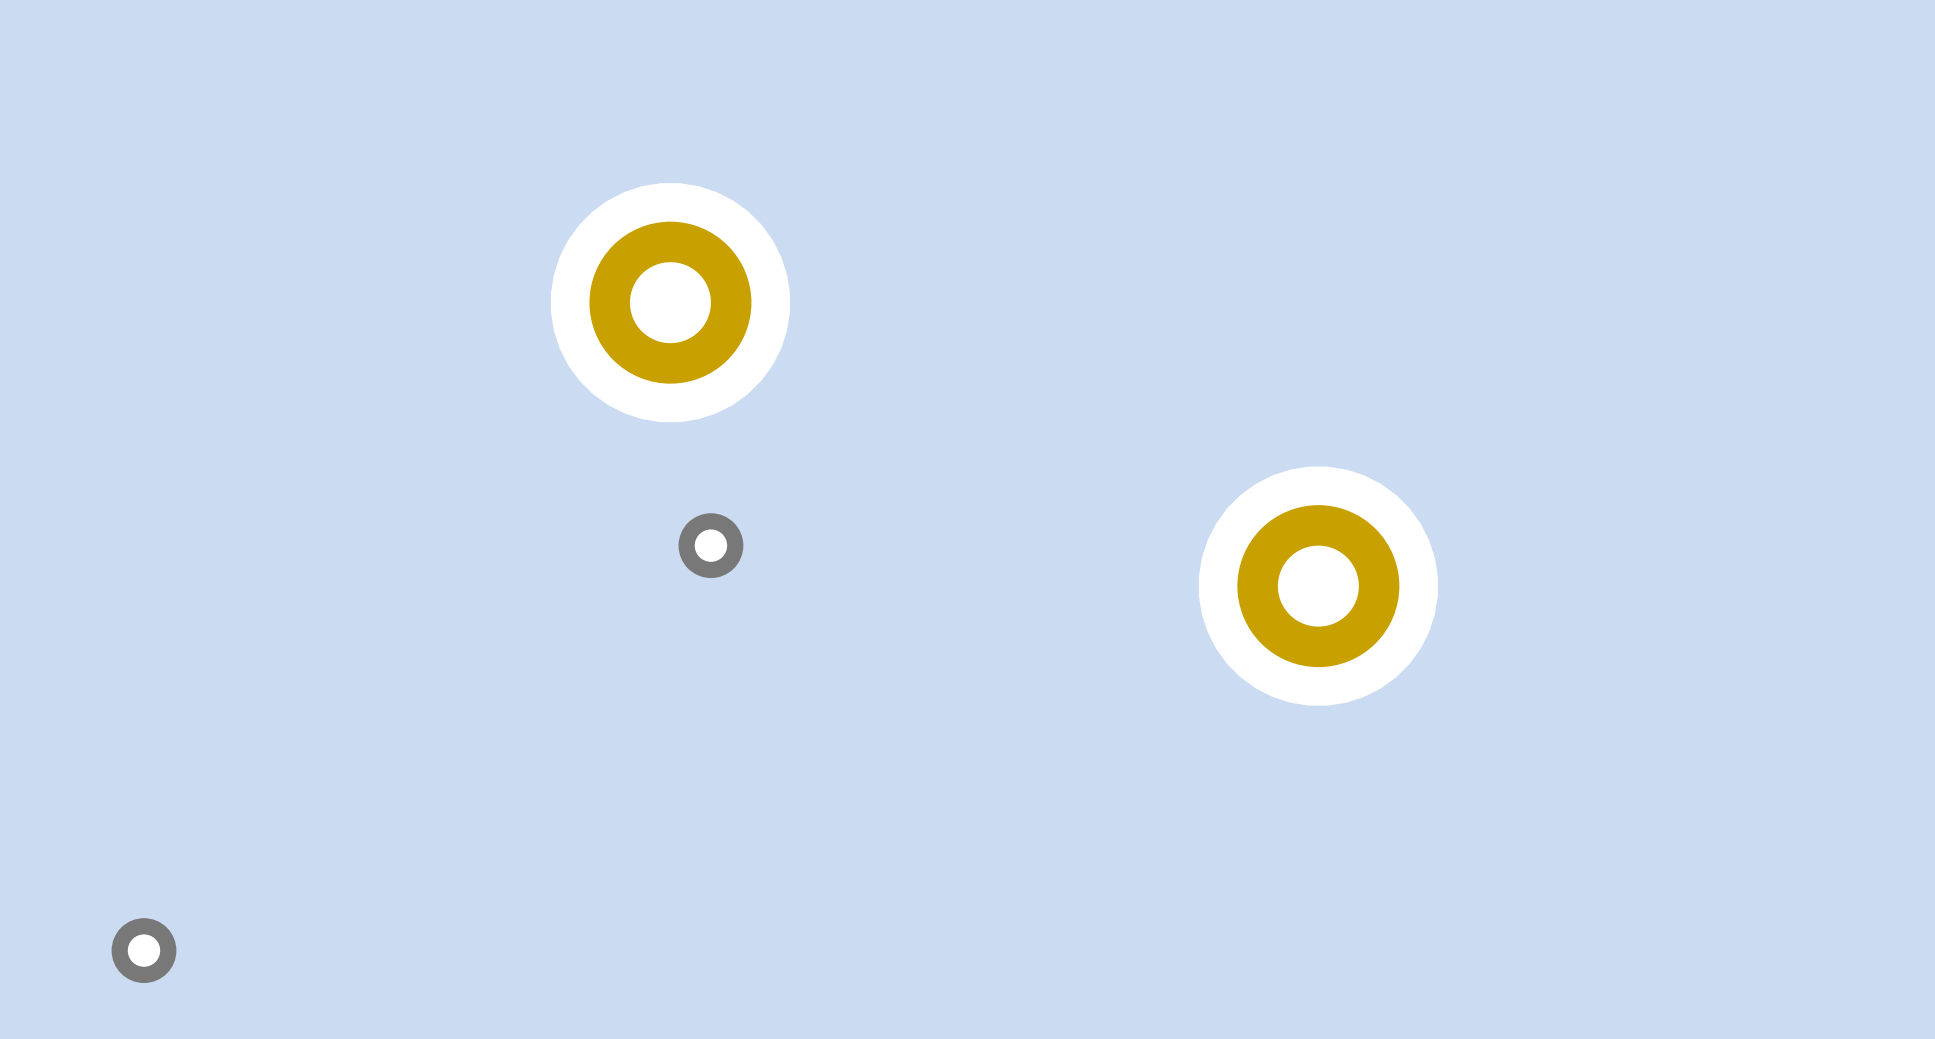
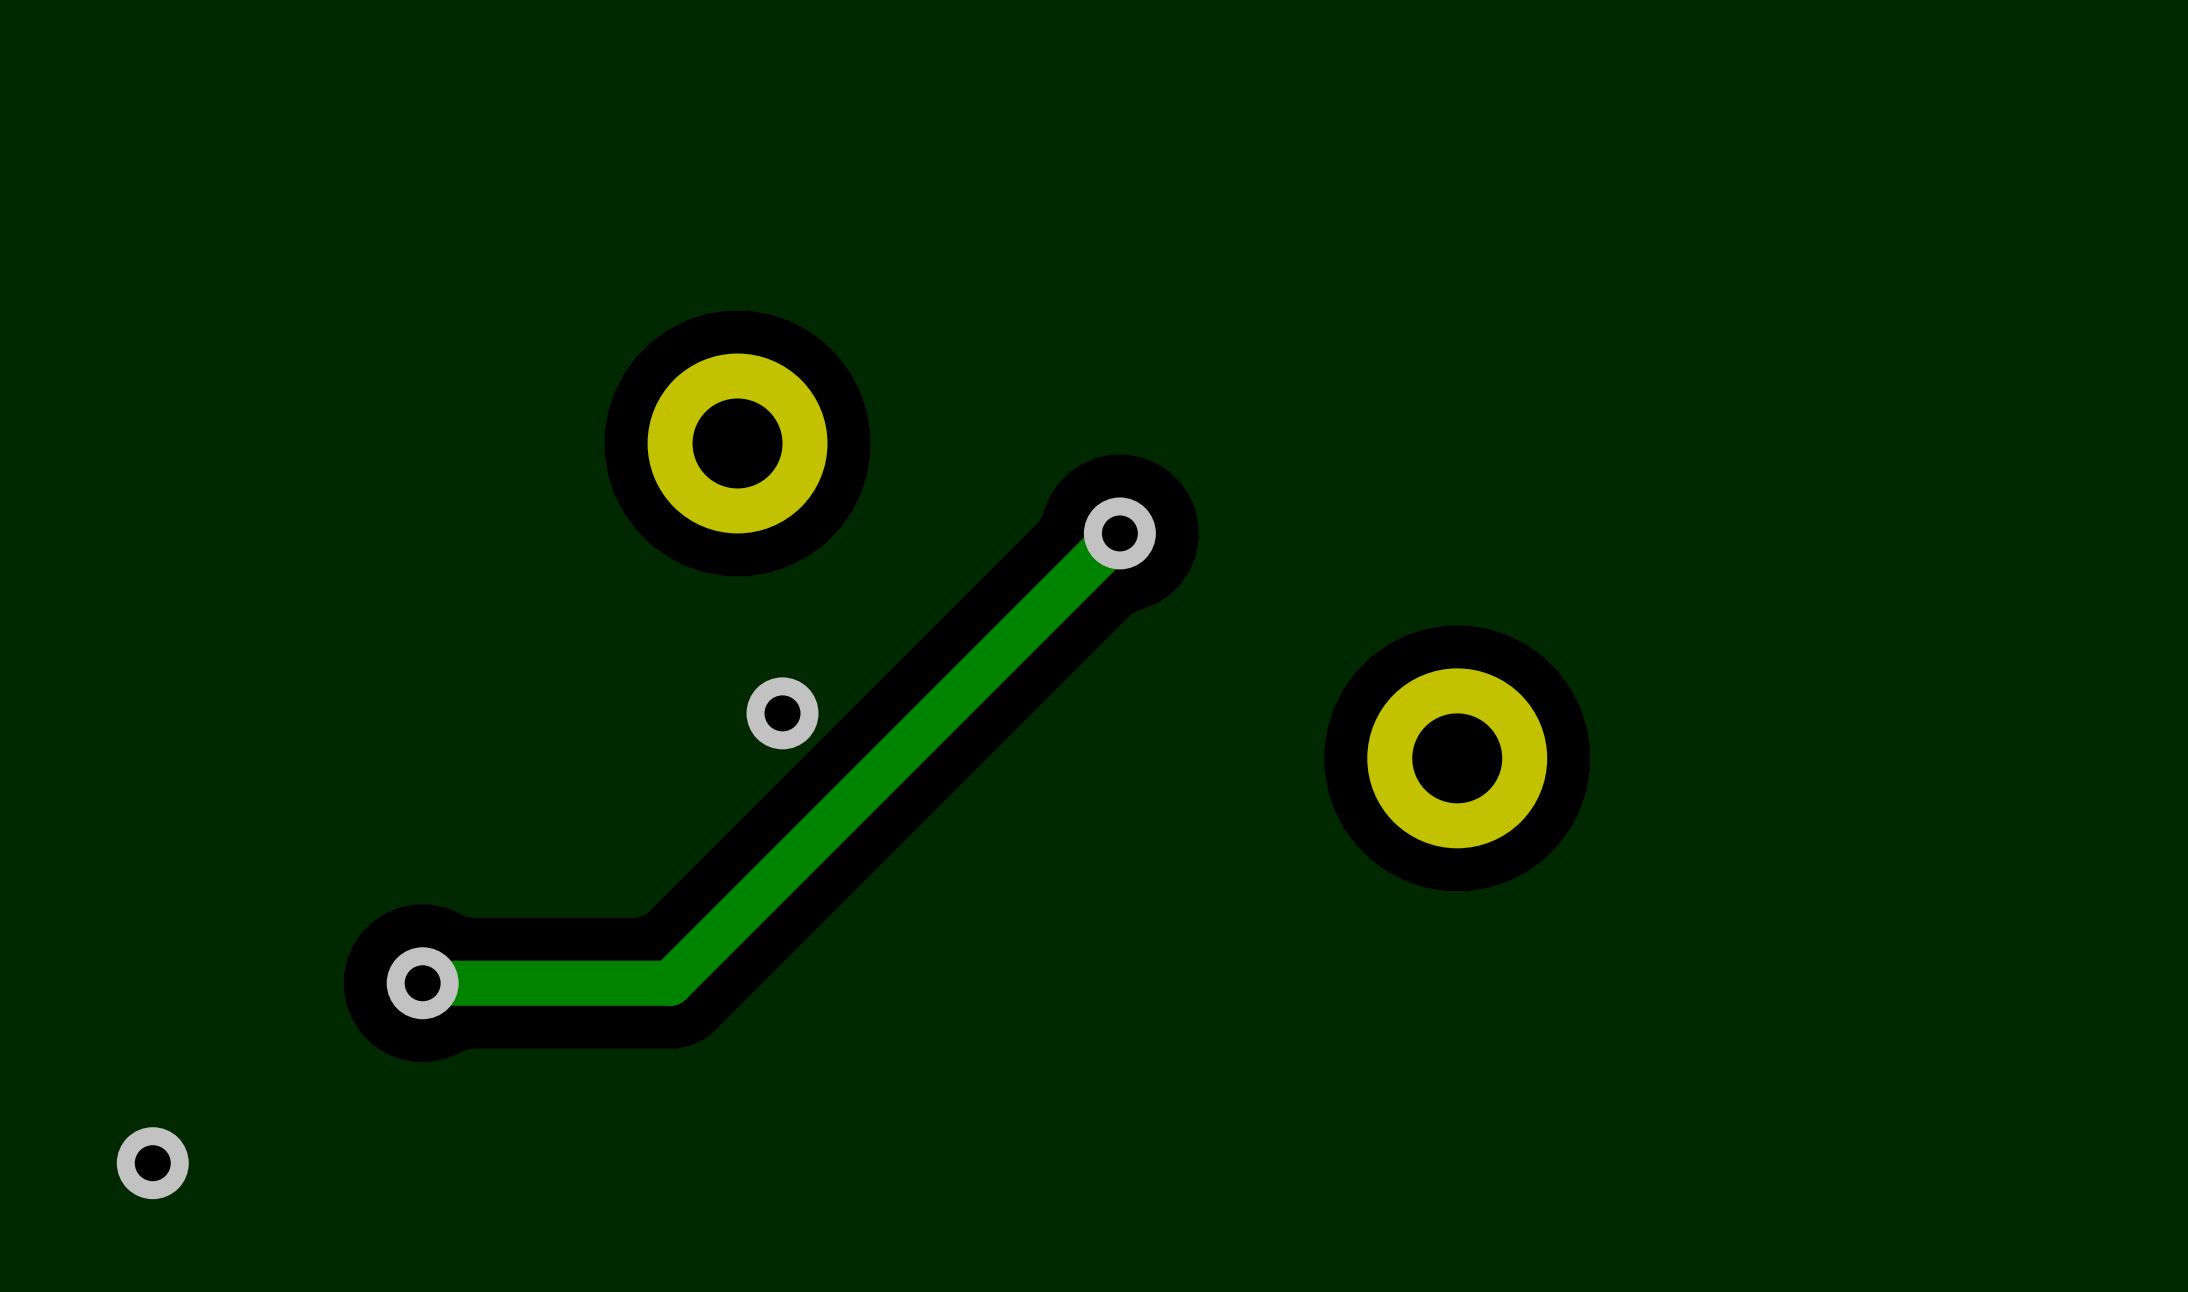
track: none -> (1119, 533) (670, 983) (422, 983)
via: none -> (1119, 533)
via: none -> (422, 983)

